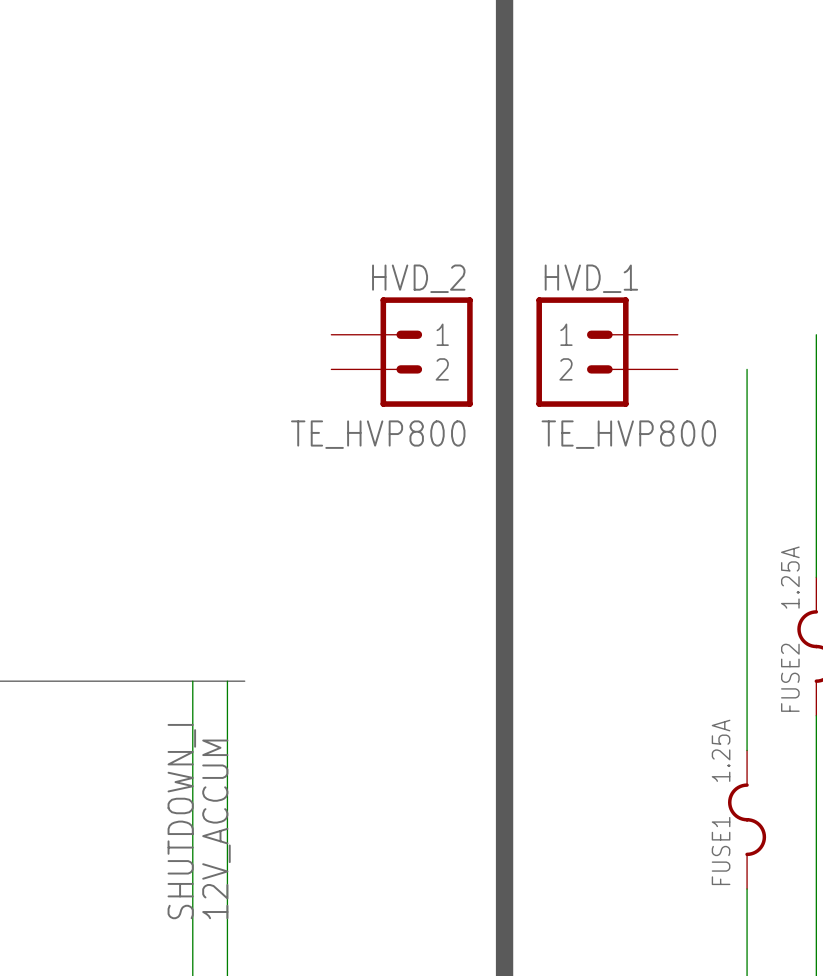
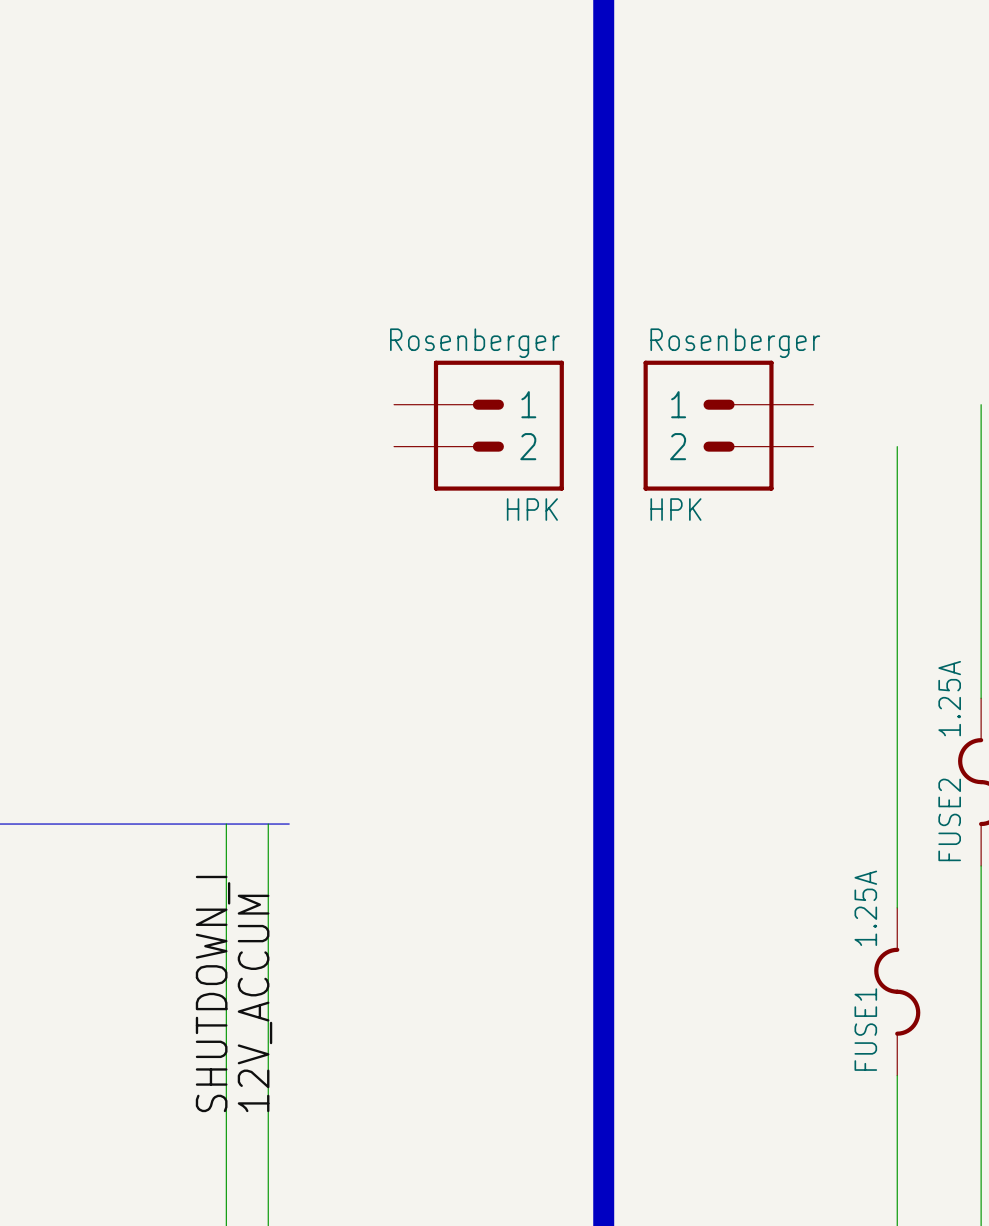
part: none -> (478, 425)
HVD_2: TE_HVP800 (402, 352) -> none
HVD_1: TE_HVP800 (607, 352) -> none
part: none -> (728, 425)

